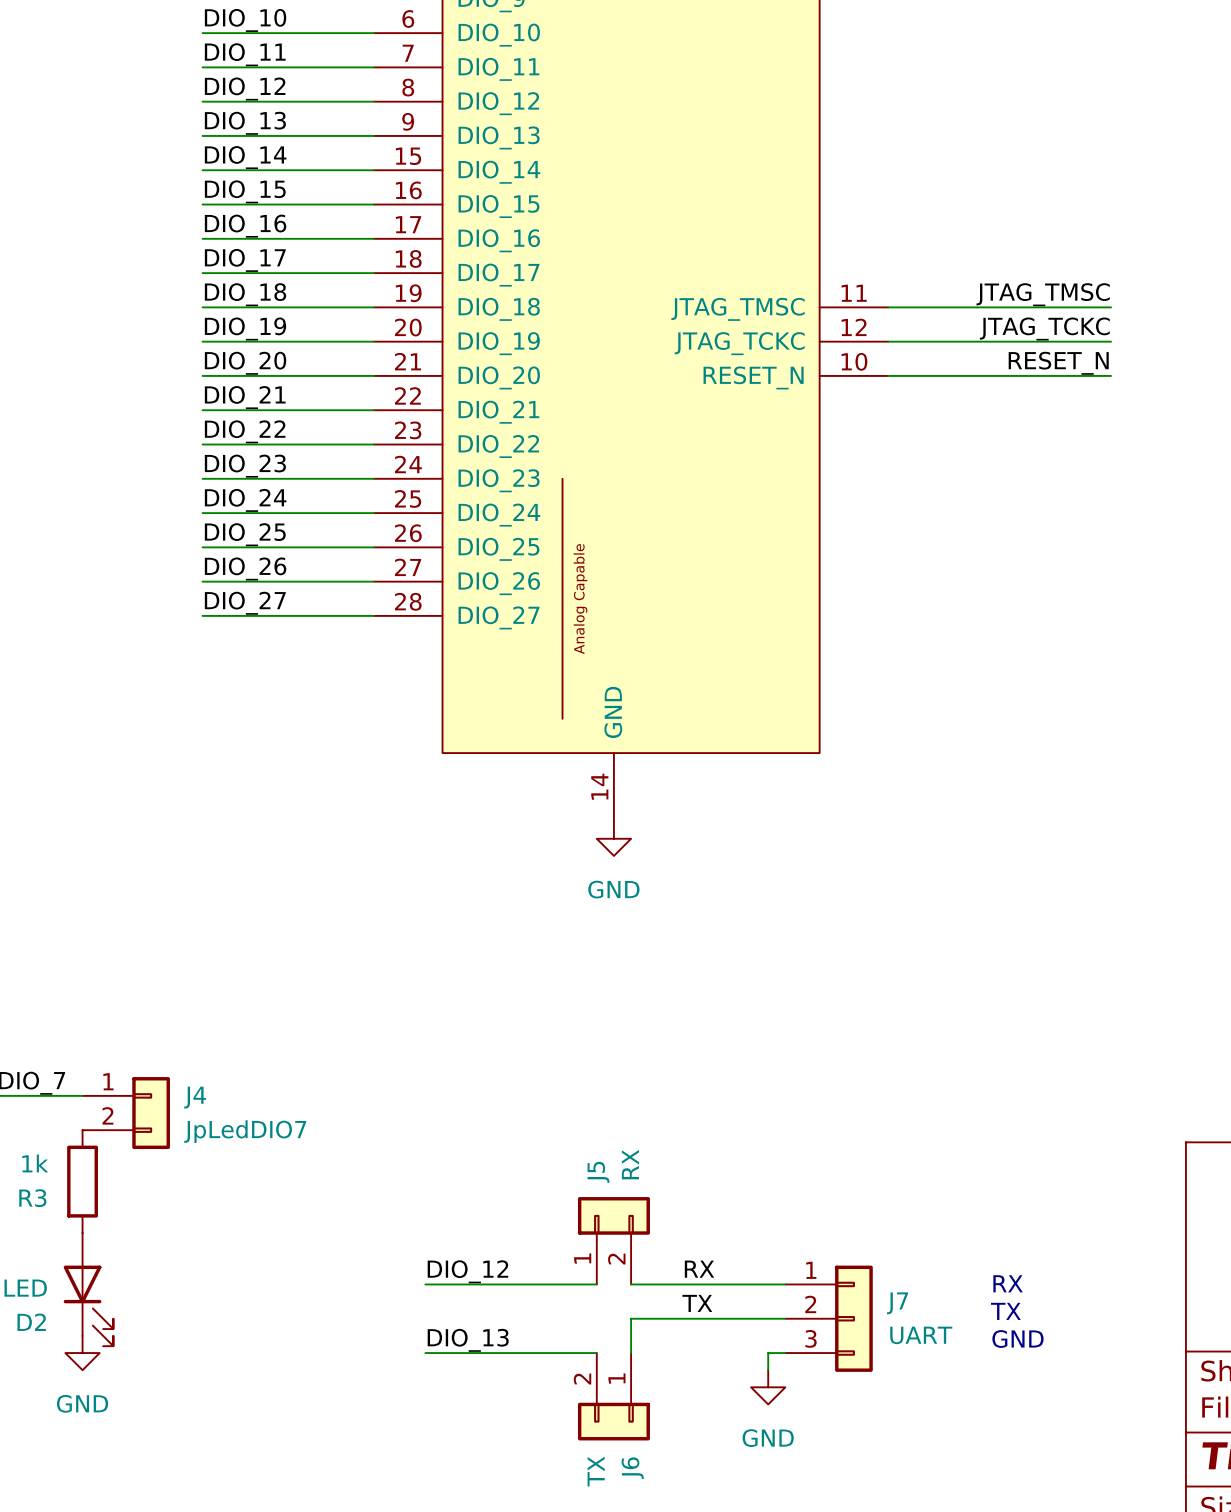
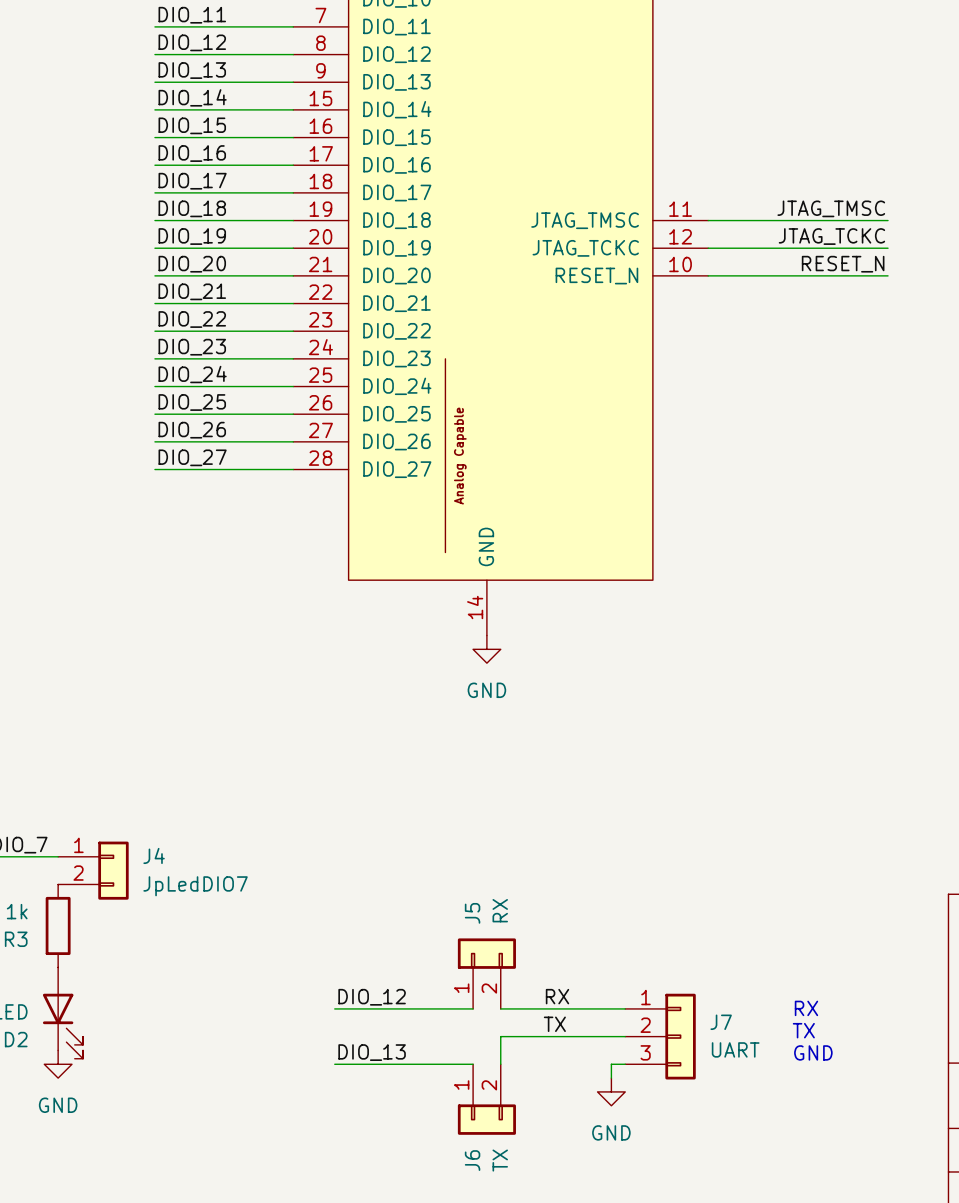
J6 flip: as is (613, 1421) -> left-right (486, 1119)

